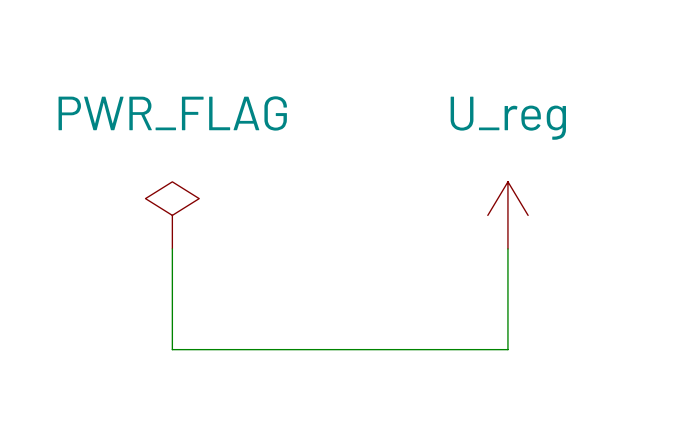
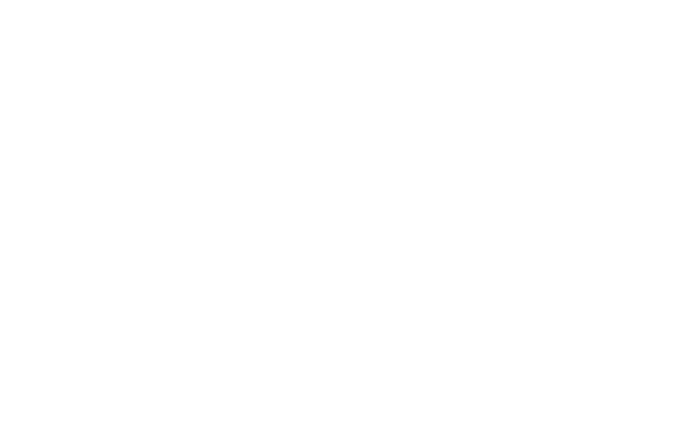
power symbol: PWR_FLAG (172, 215) -> none
power symbol: U_reg (507, 215) -> none
wire: (172, 248) (172, 349) (507, 349) (507, 248) -> none

